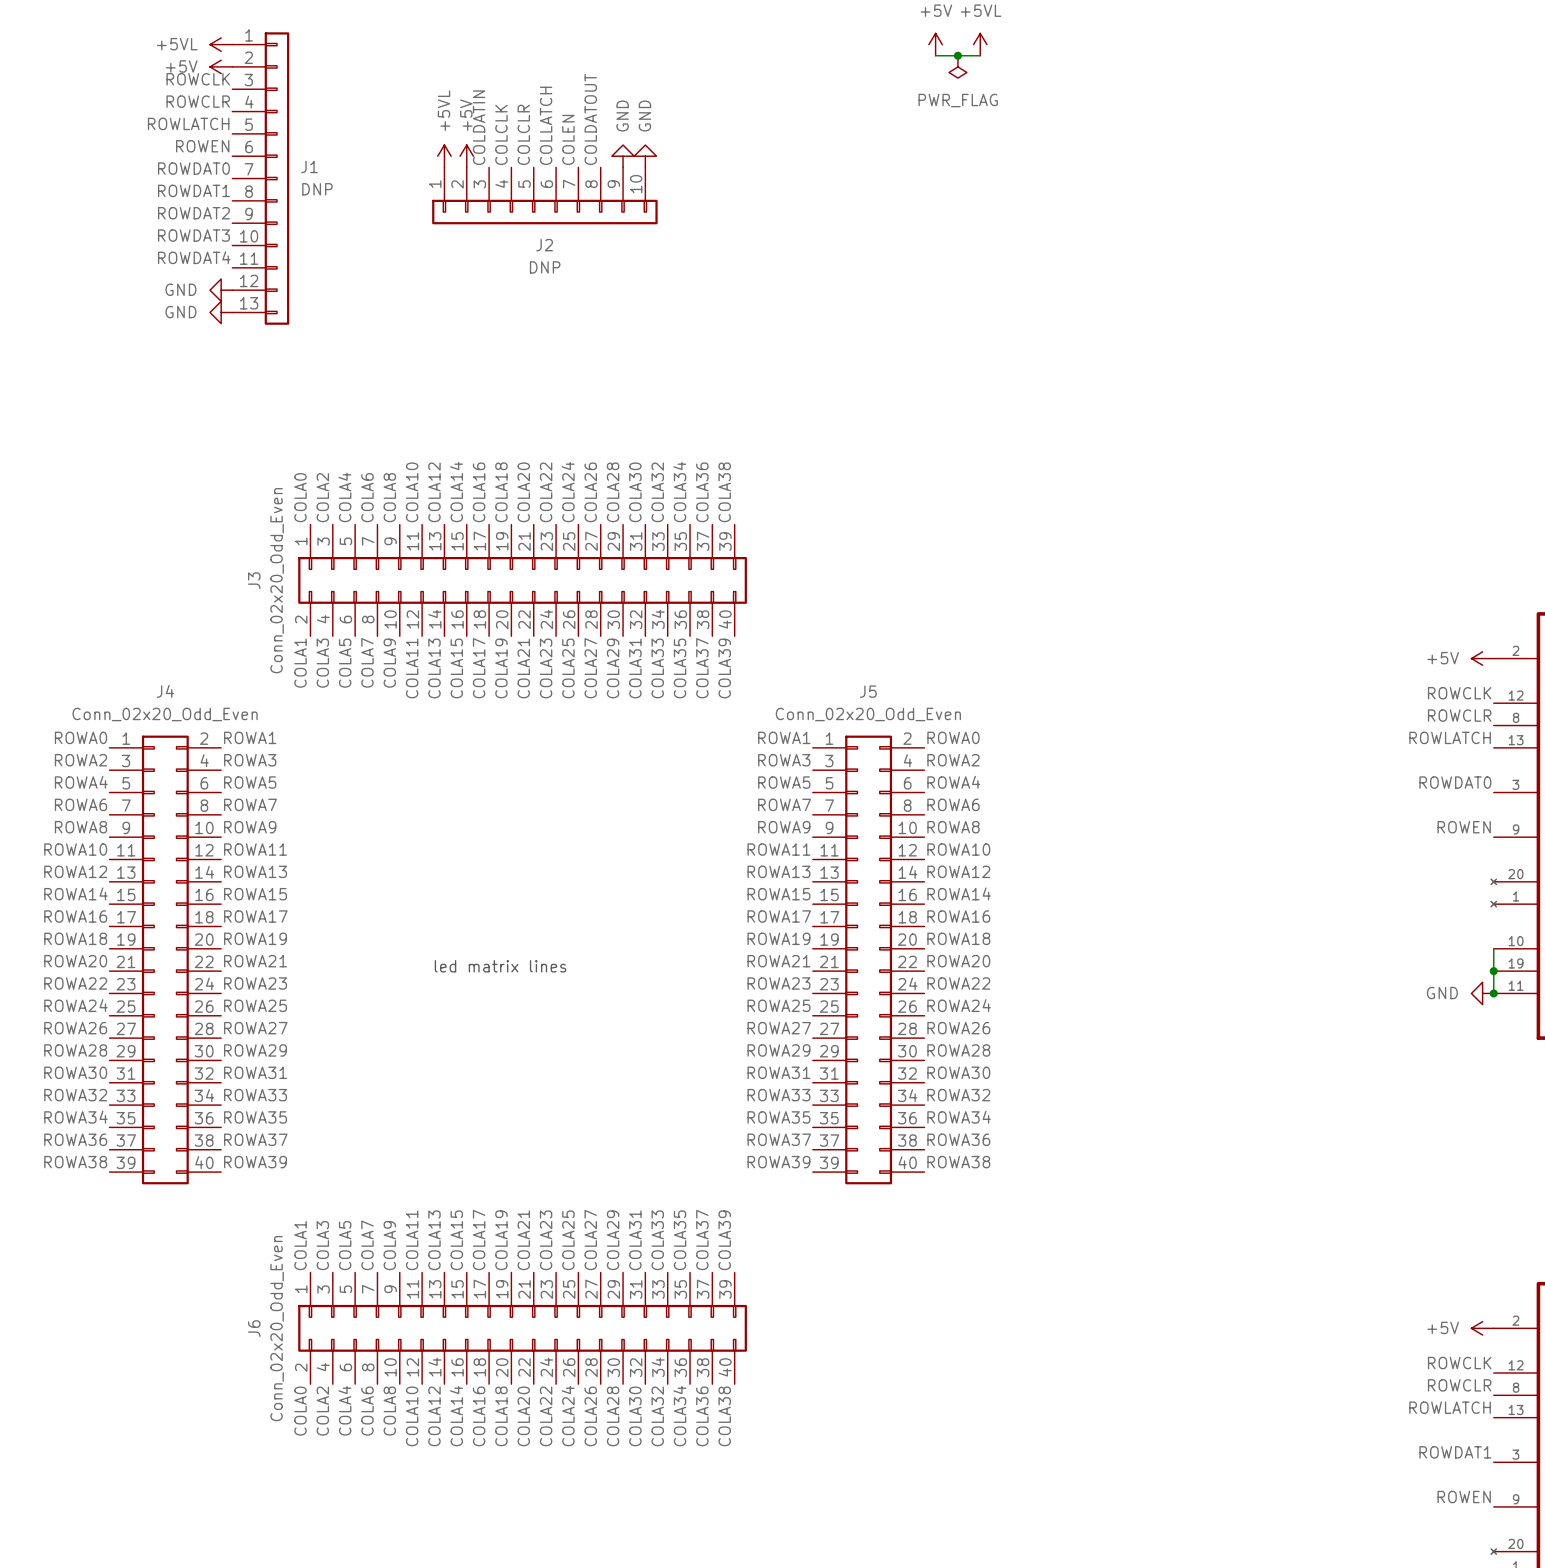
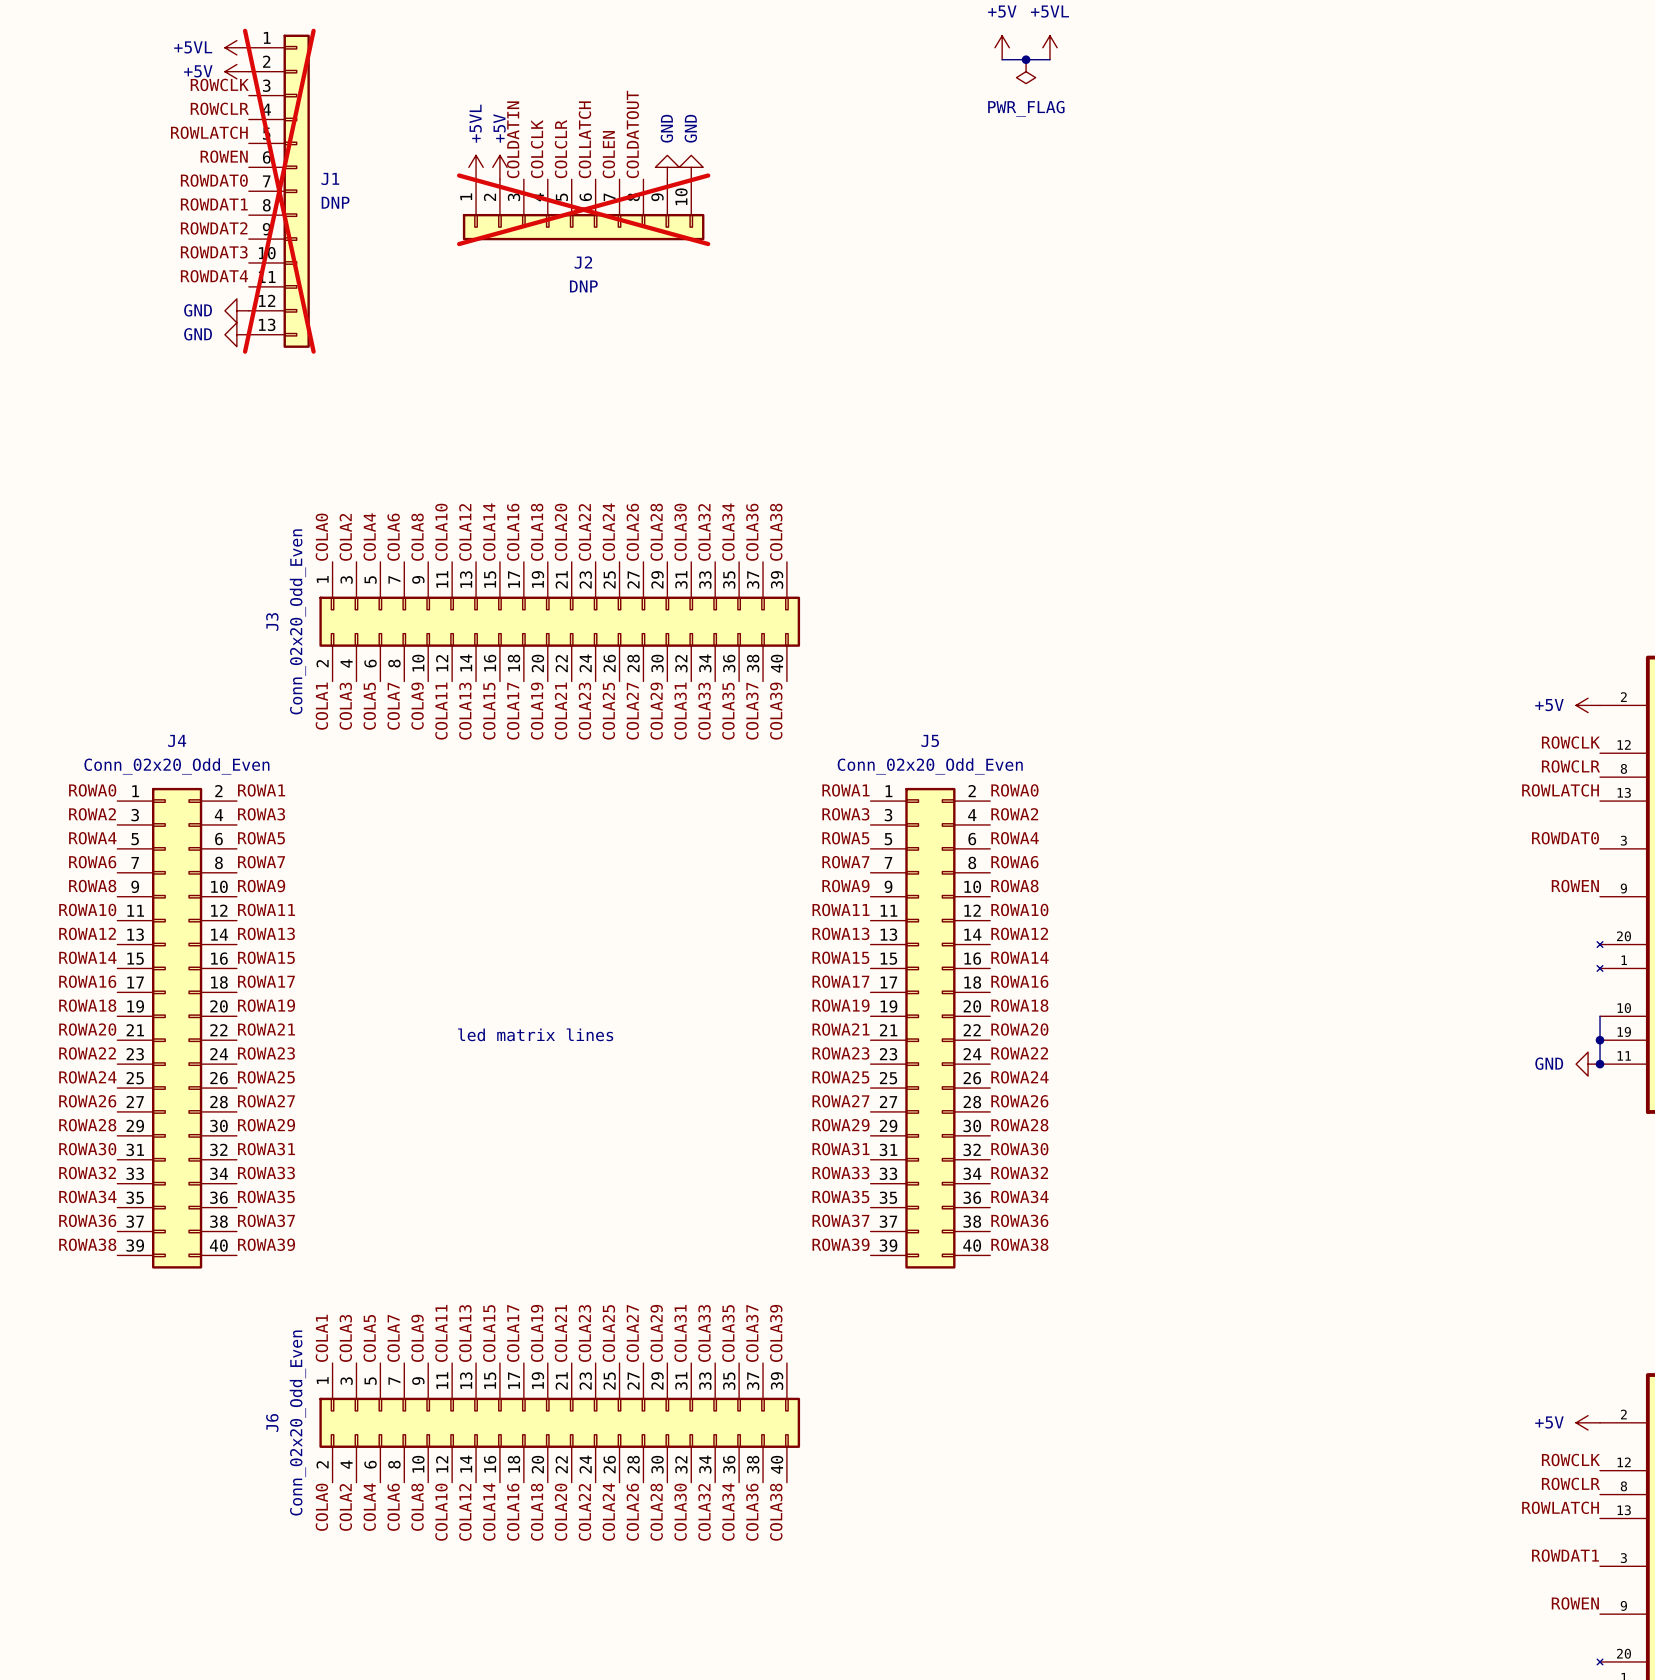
J1 do-not-place cross: none -> (279, 191)
J2 do-not-place cross: none -> (583, 209)

